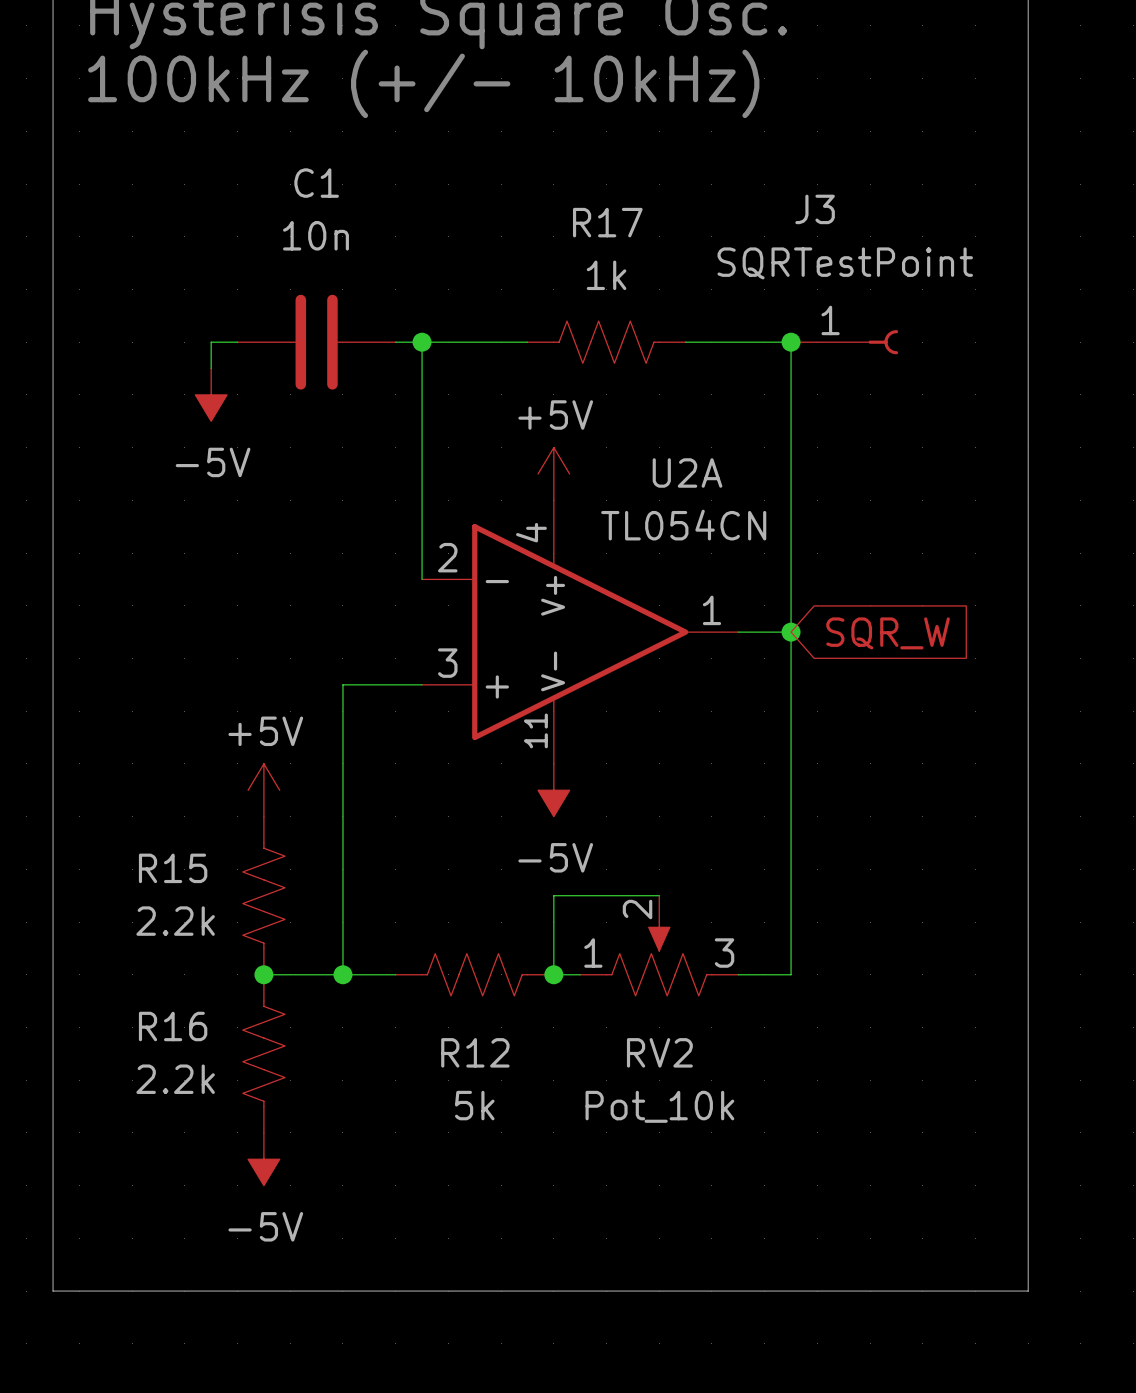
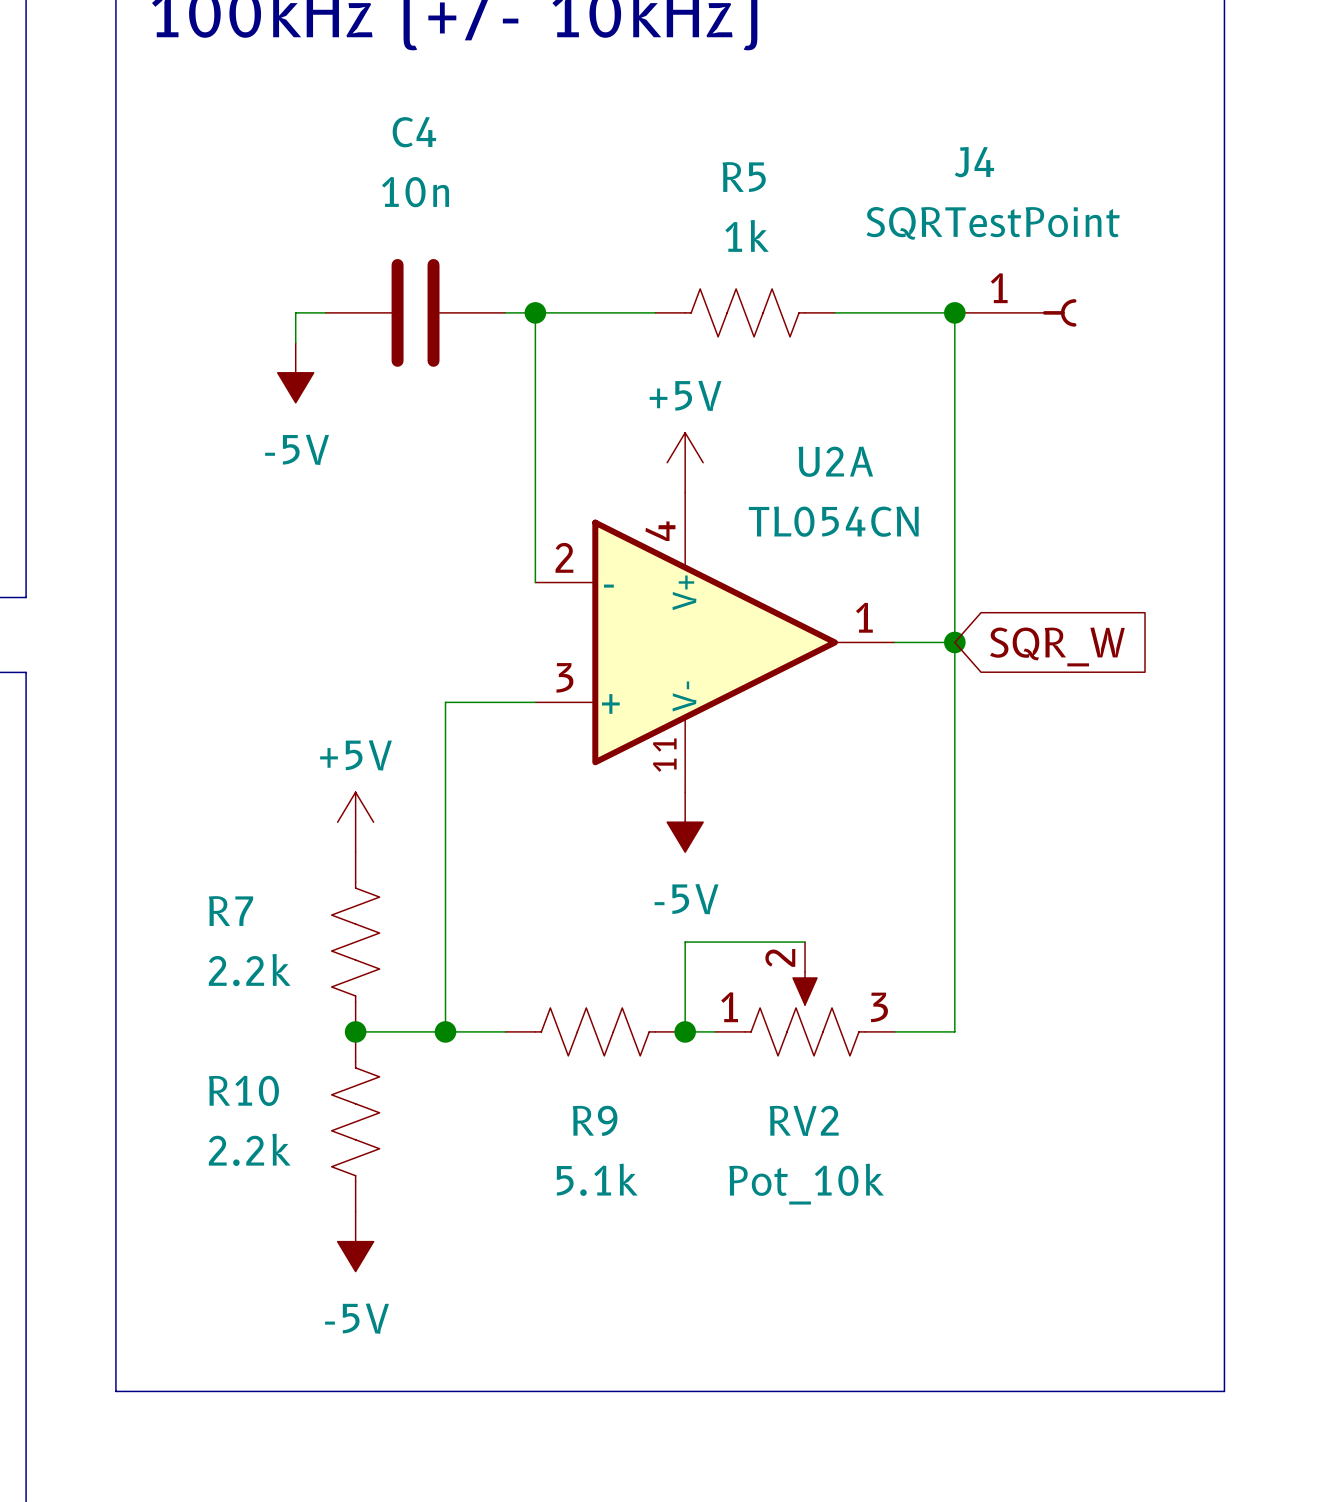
C1 name: C1 (316, 183) -> C4 (414, 132)
J3 name: J3 (815, 209) -> J4 (974, 162)
R17 name: R17 (607, 222) -> R5 (744, 177)
R15 name: R15 (173, 868) -> R7 (231, 911)
R16 name: R16 (173, 1026) -> R10 (243, 1090)
R12 name: R12 (475, 1052) -> R9 (595, 1120)
R12 value: 5k (474, 1105) -> 5.1k (597, 1179)

